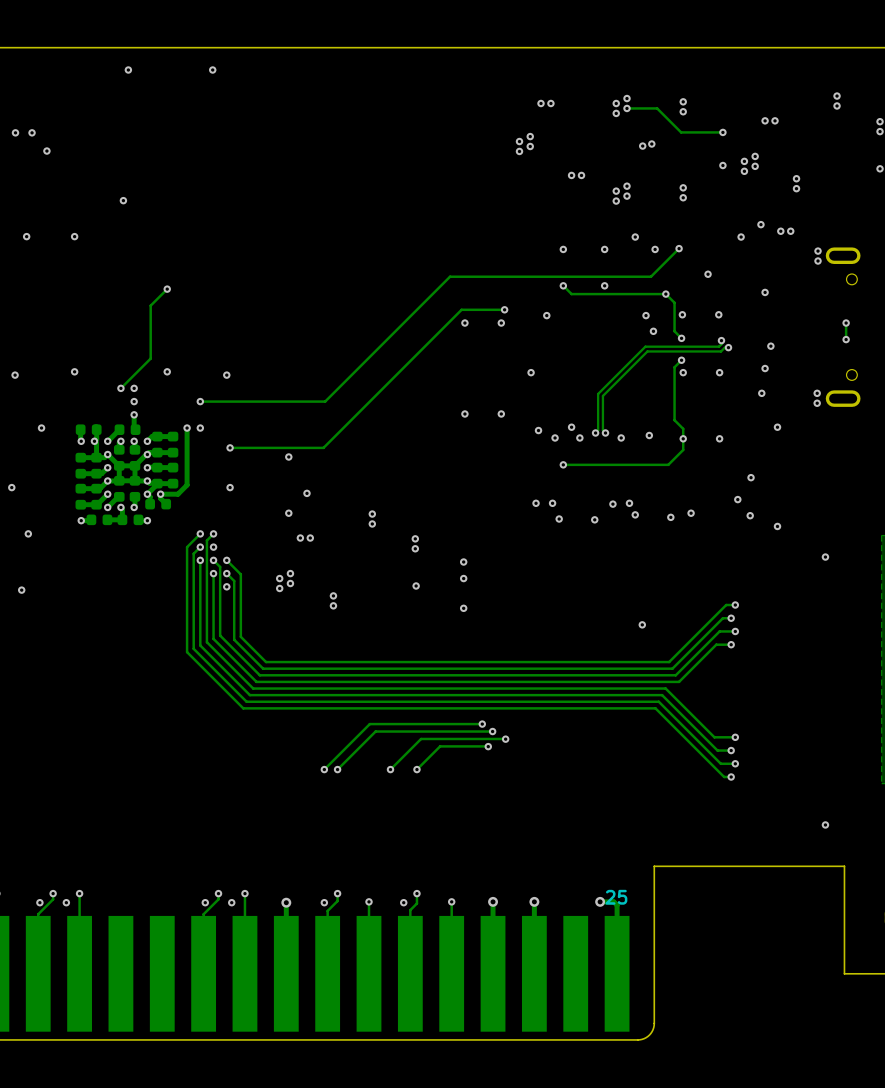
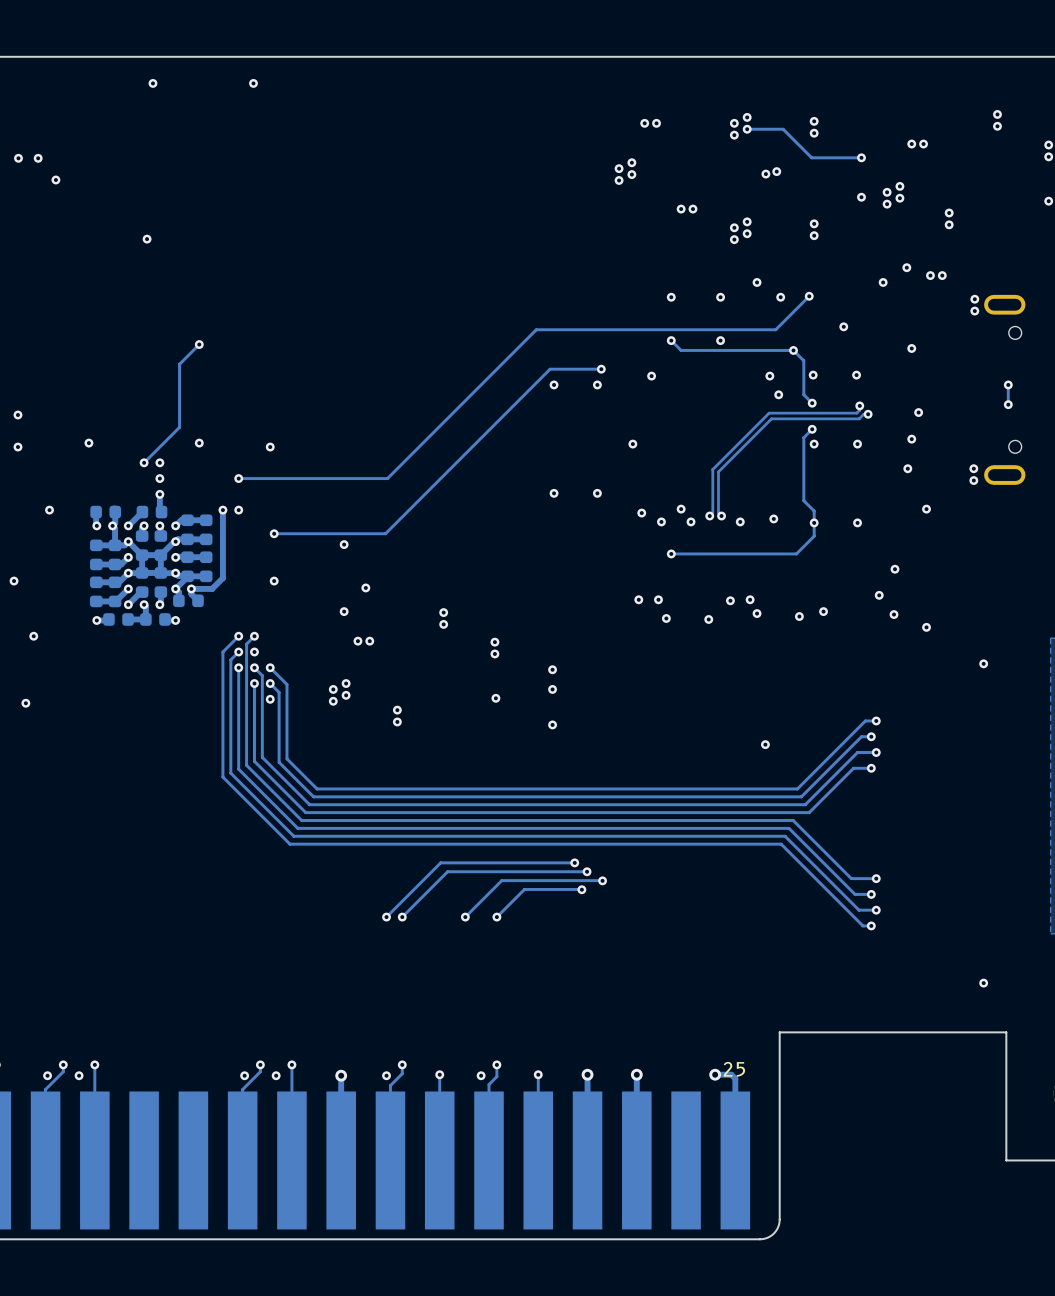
via: (26, 236) -> none
via: (74, 236) -> none
via: none -> (17, 415)

